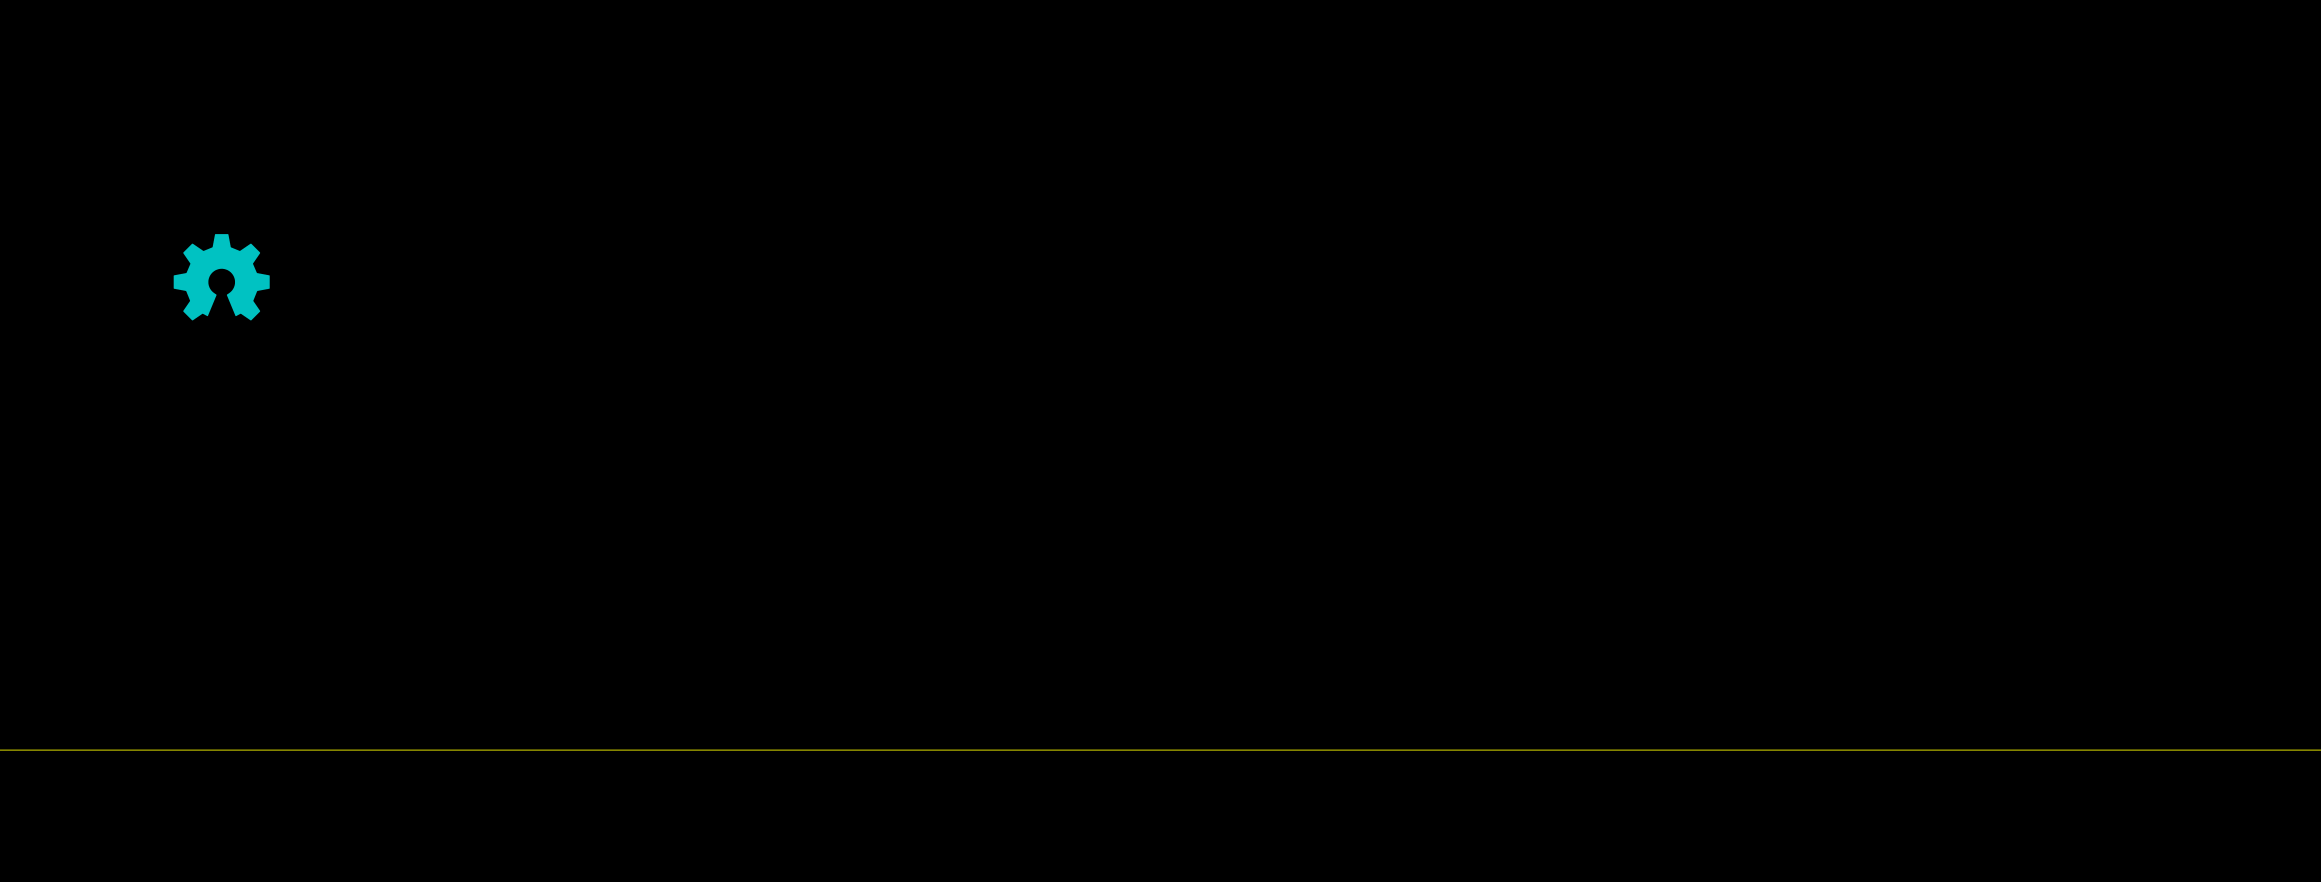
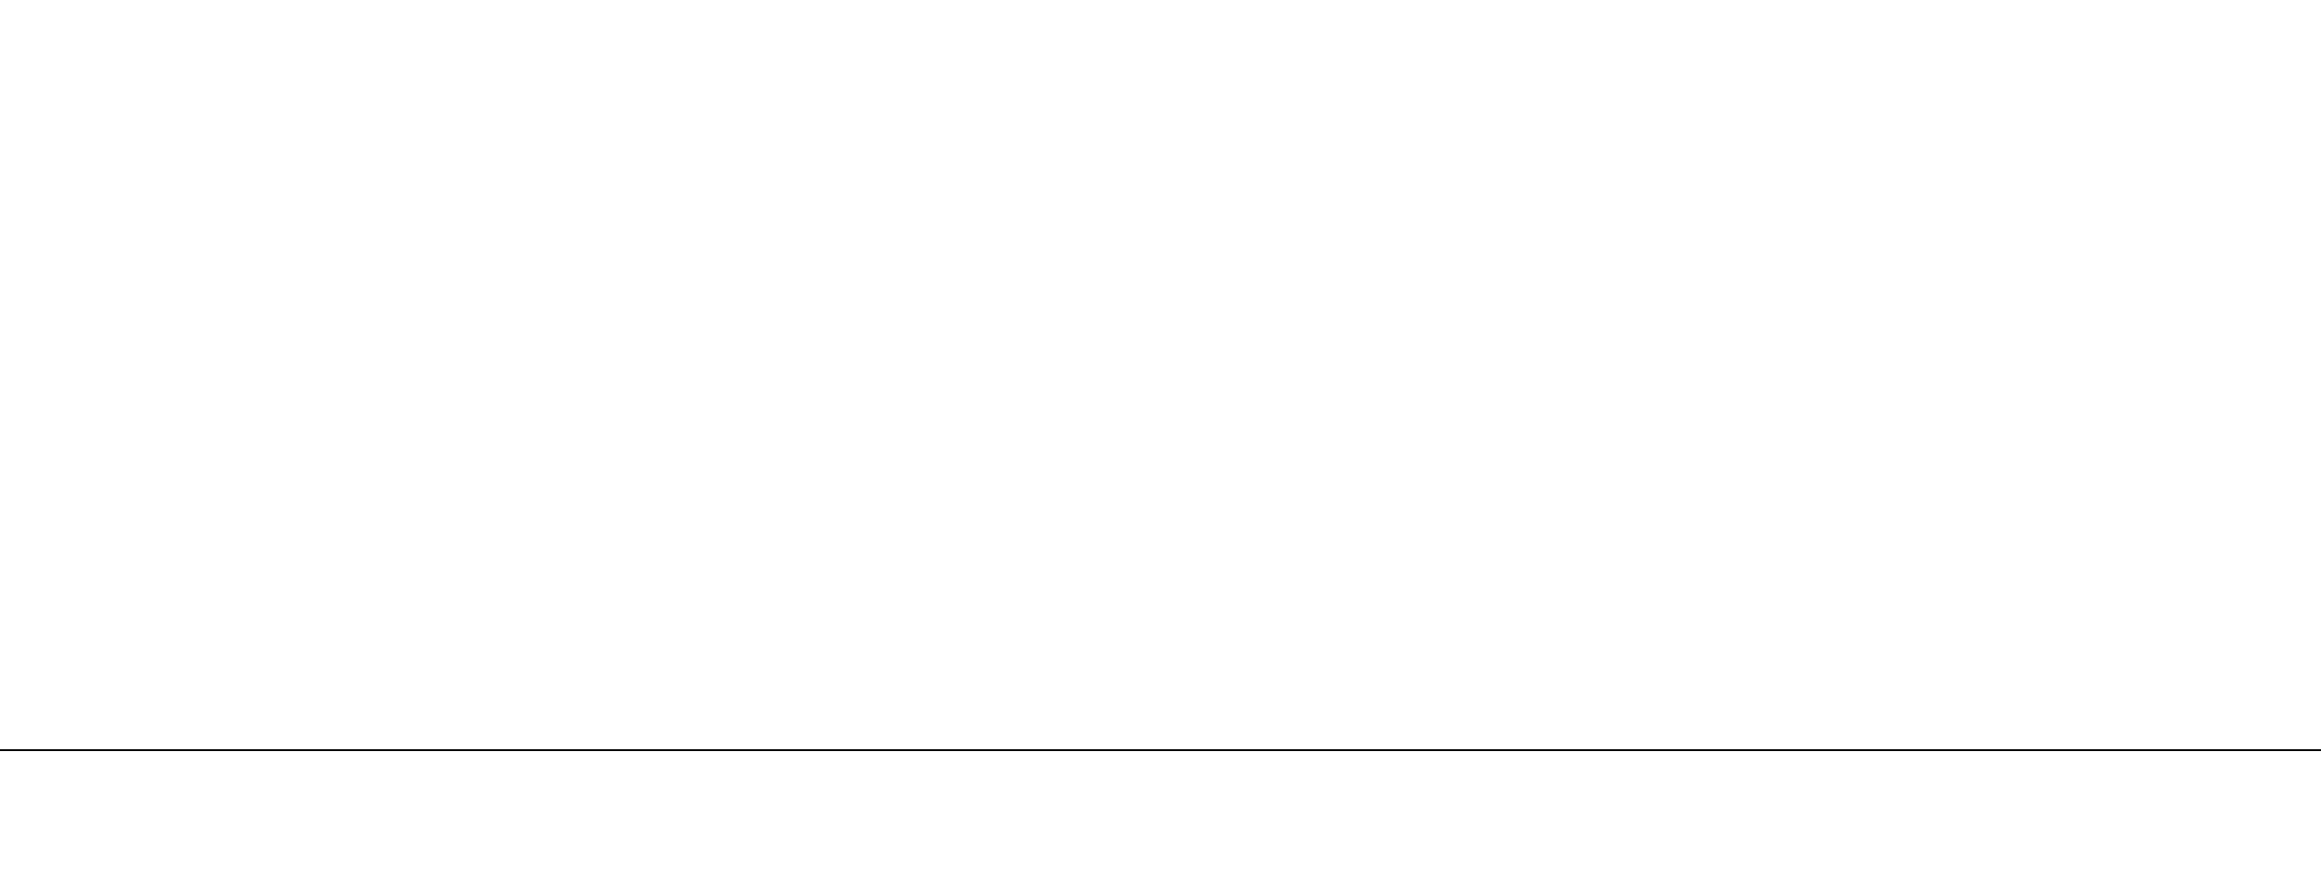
drawing: [173, 234, 270, 321] -> none

